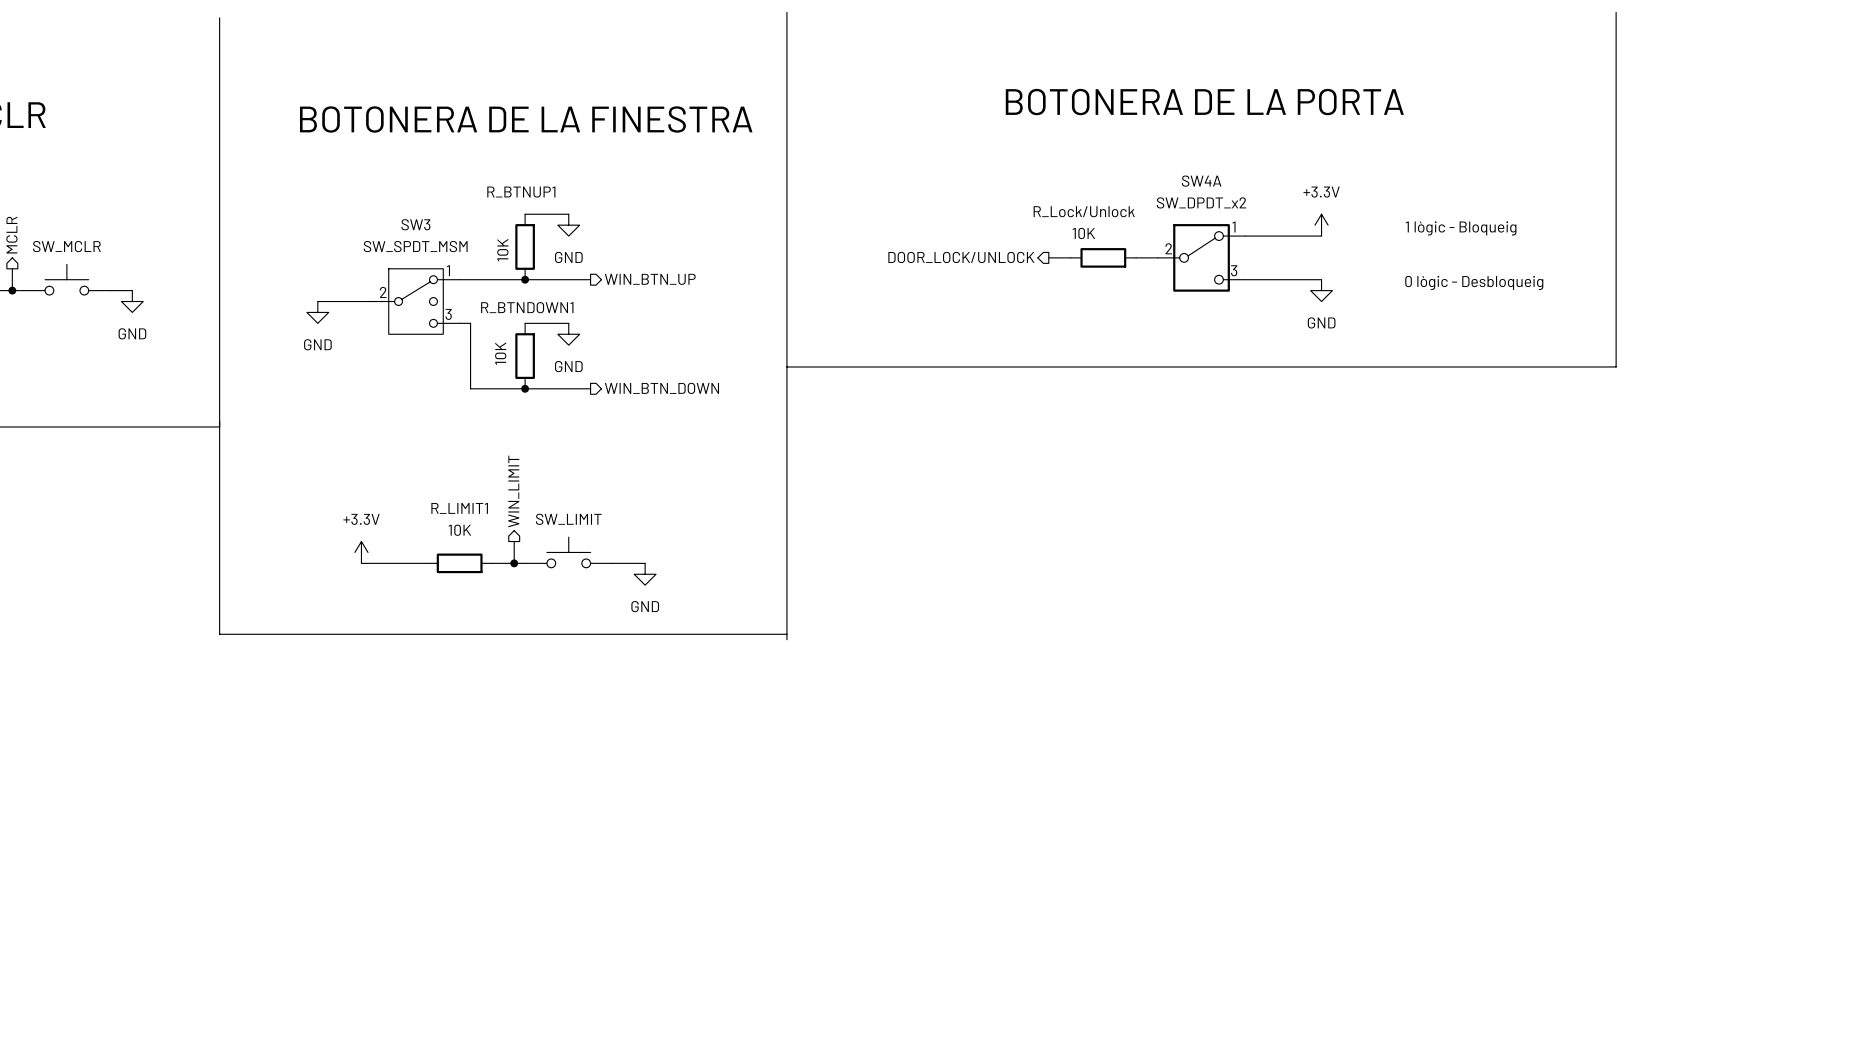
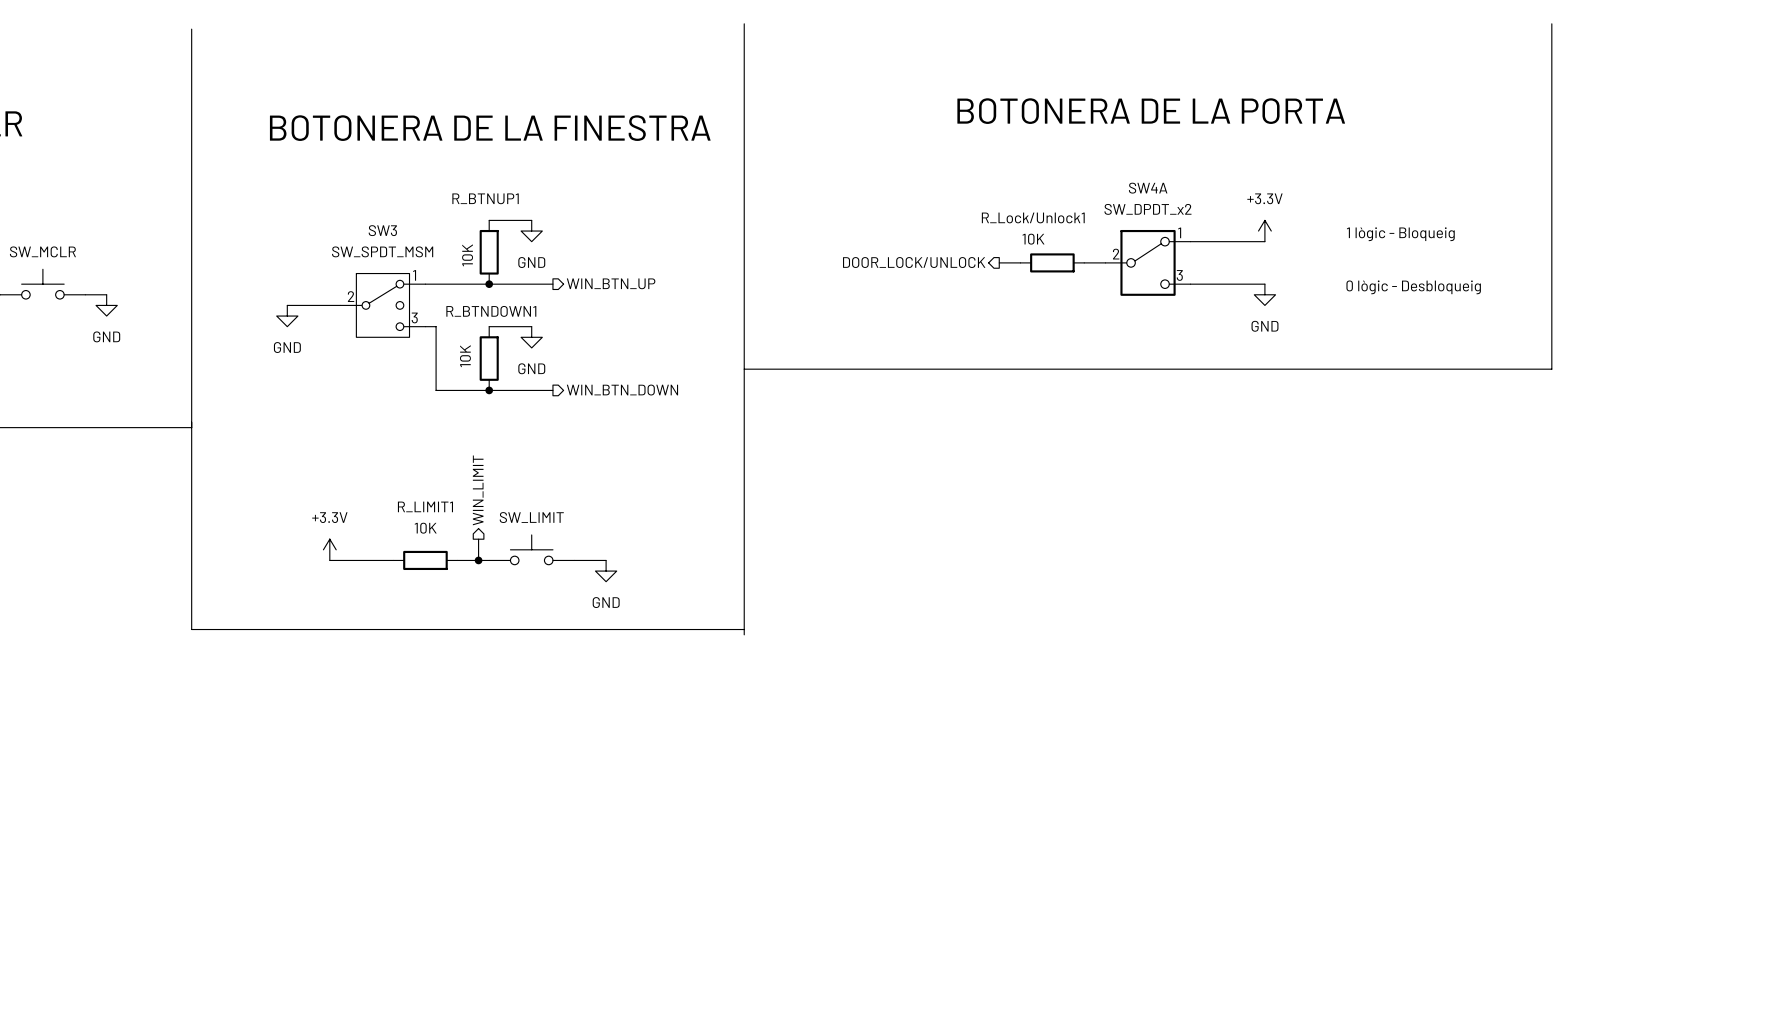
R_Lock/Unlock name: R_Lock/Unlock (1084, 211) -> R_Lock/Unlock1 (1033, 217)

